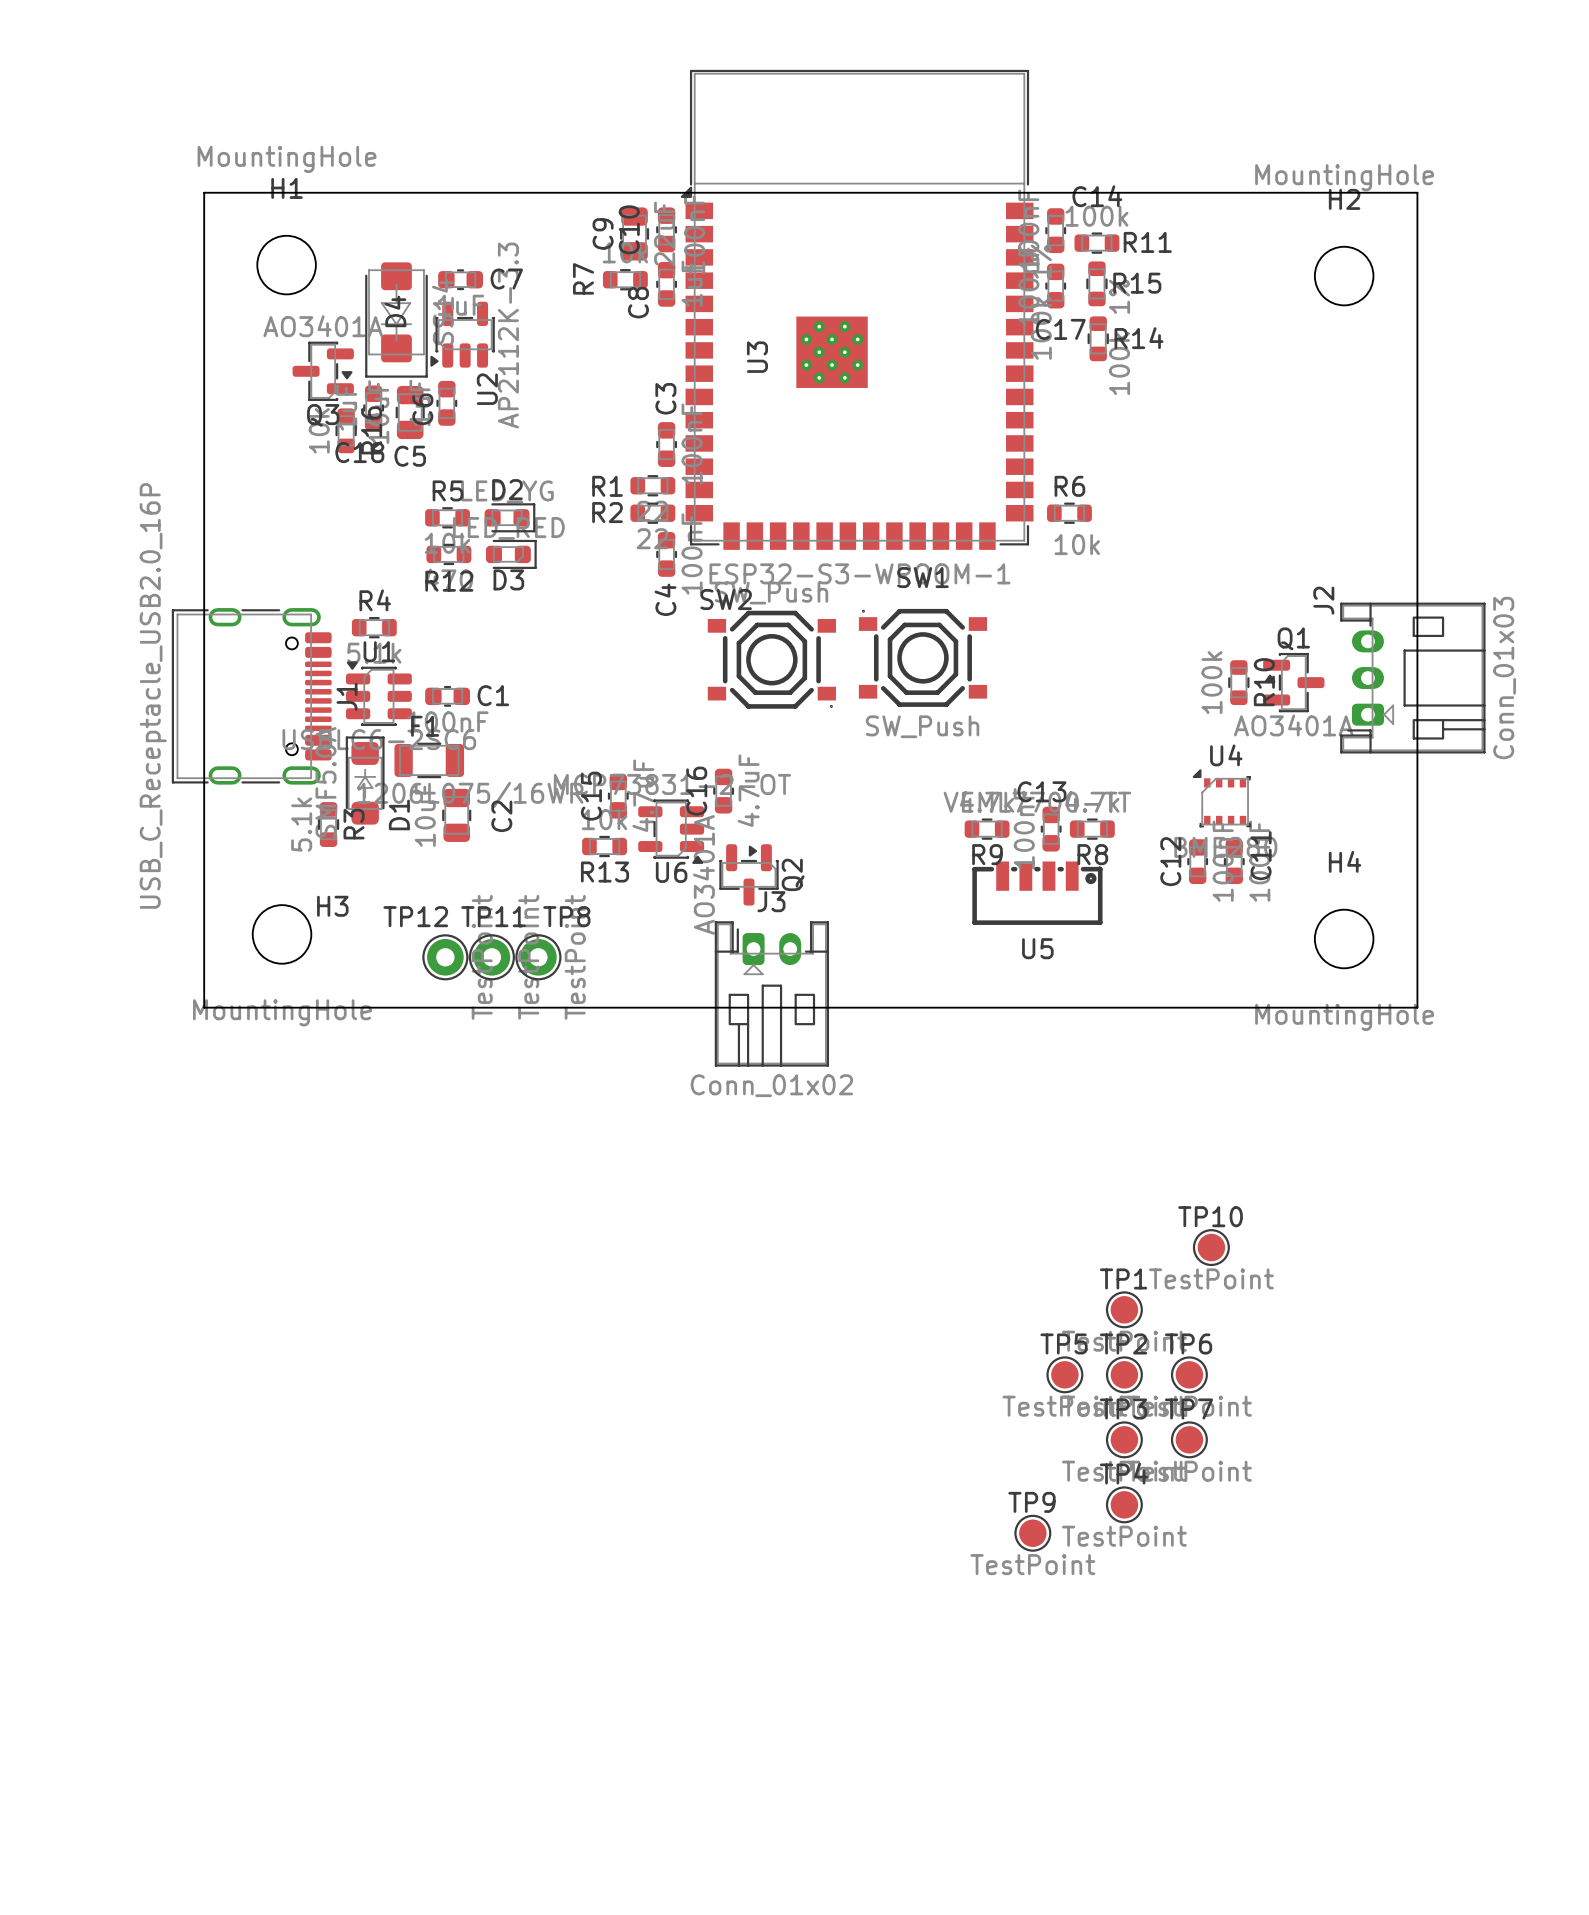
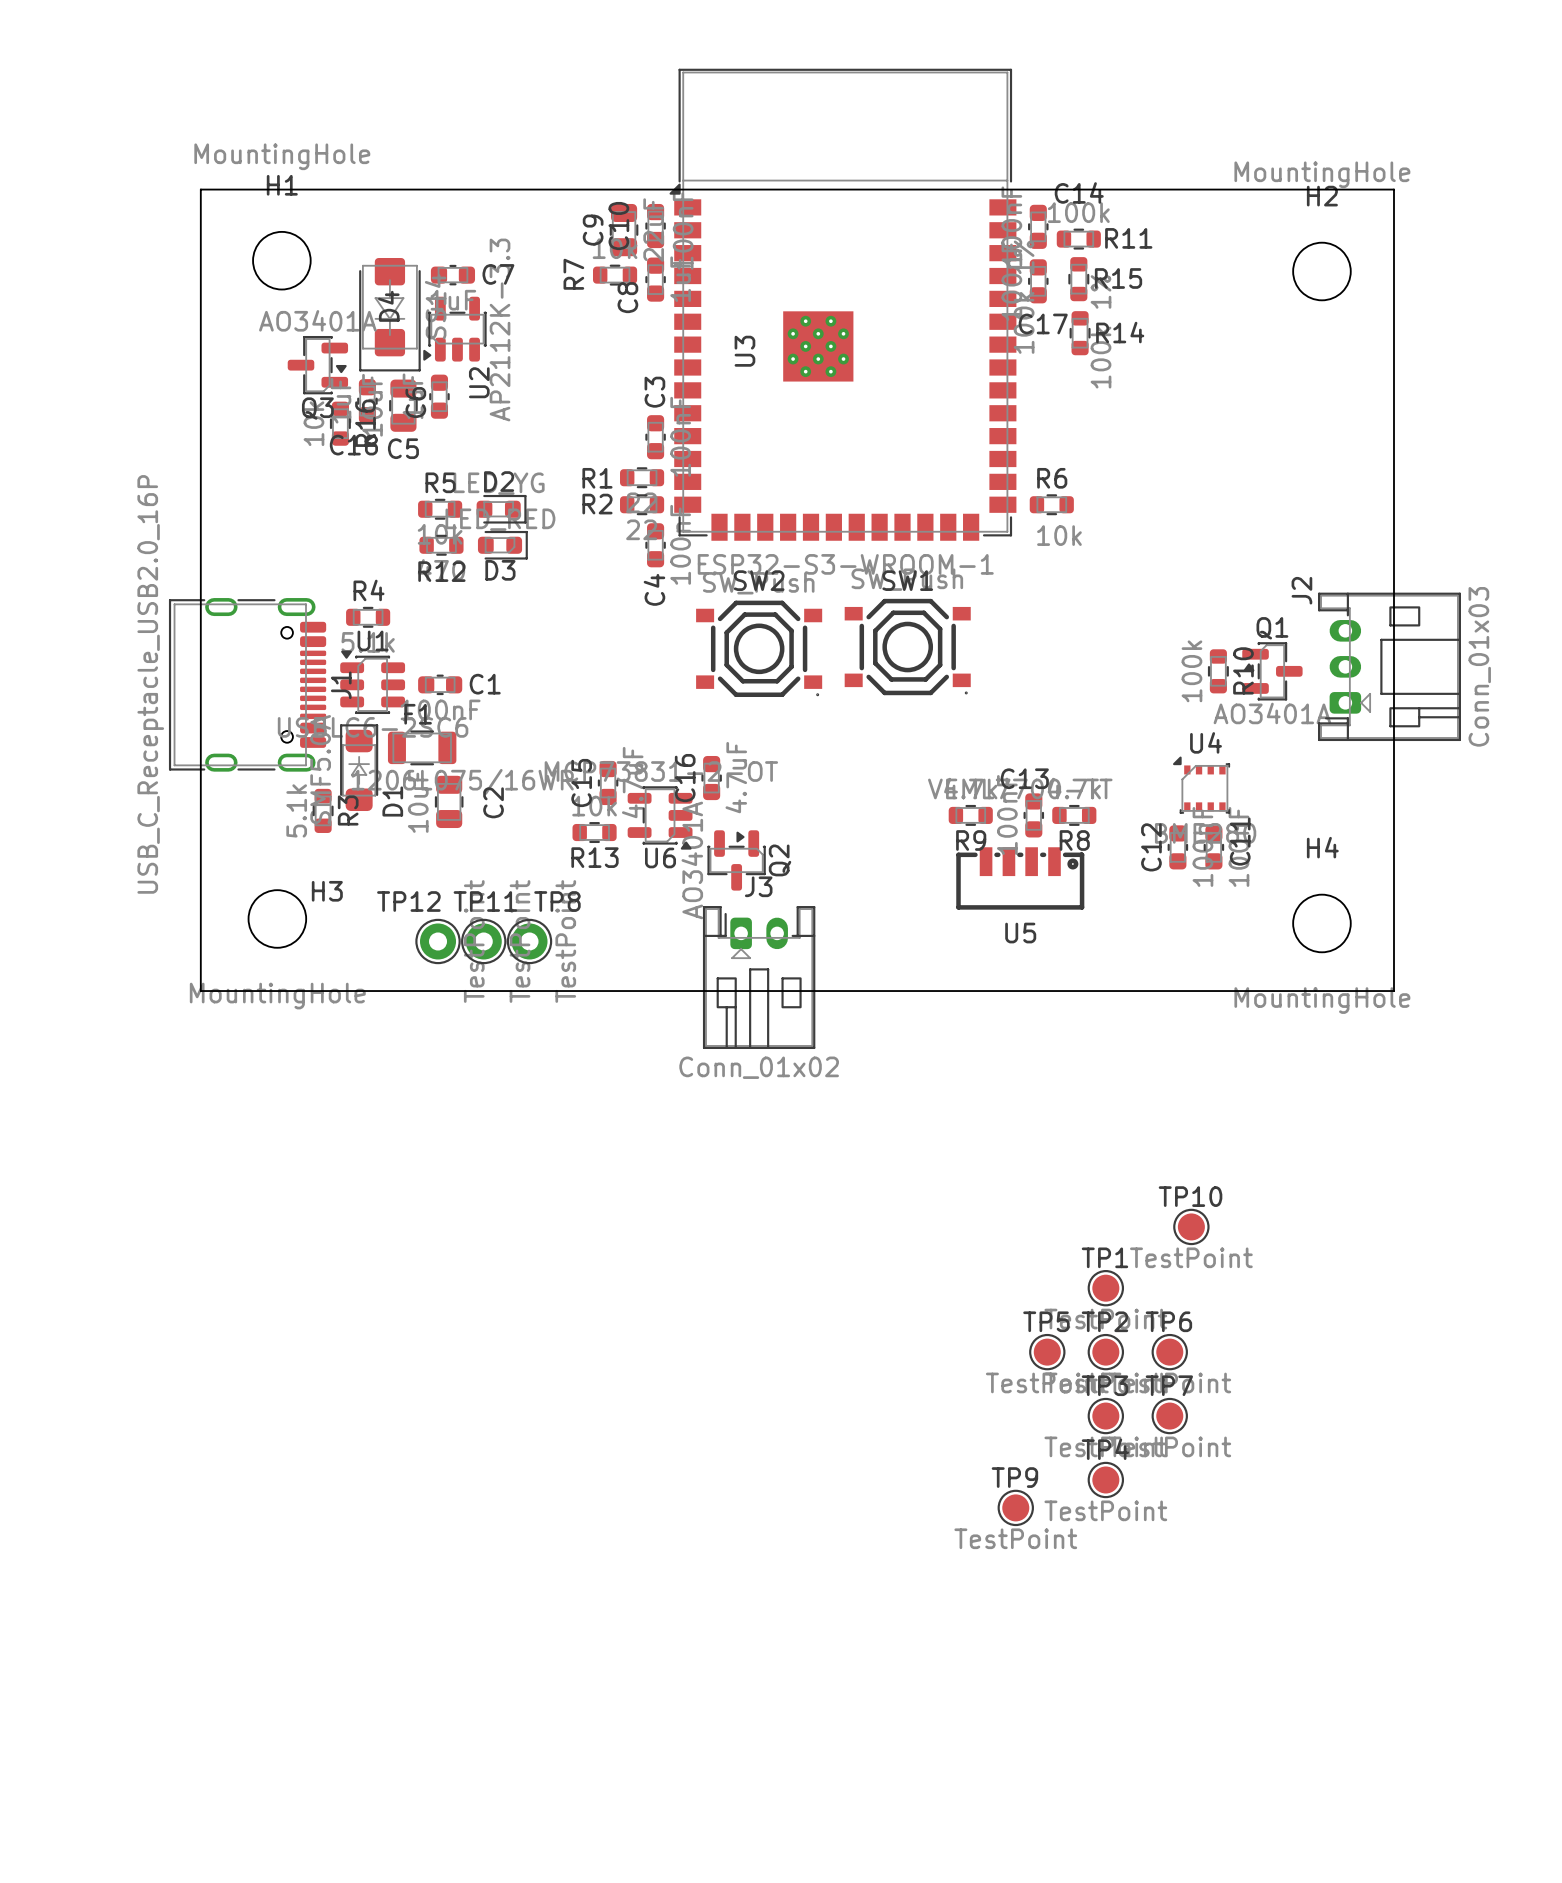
SW2 name position: SW2 (726, 599) -> SW2 (759, 580)
SW1 rotation: 0° (922, 657) -> 180° (907, 647)

